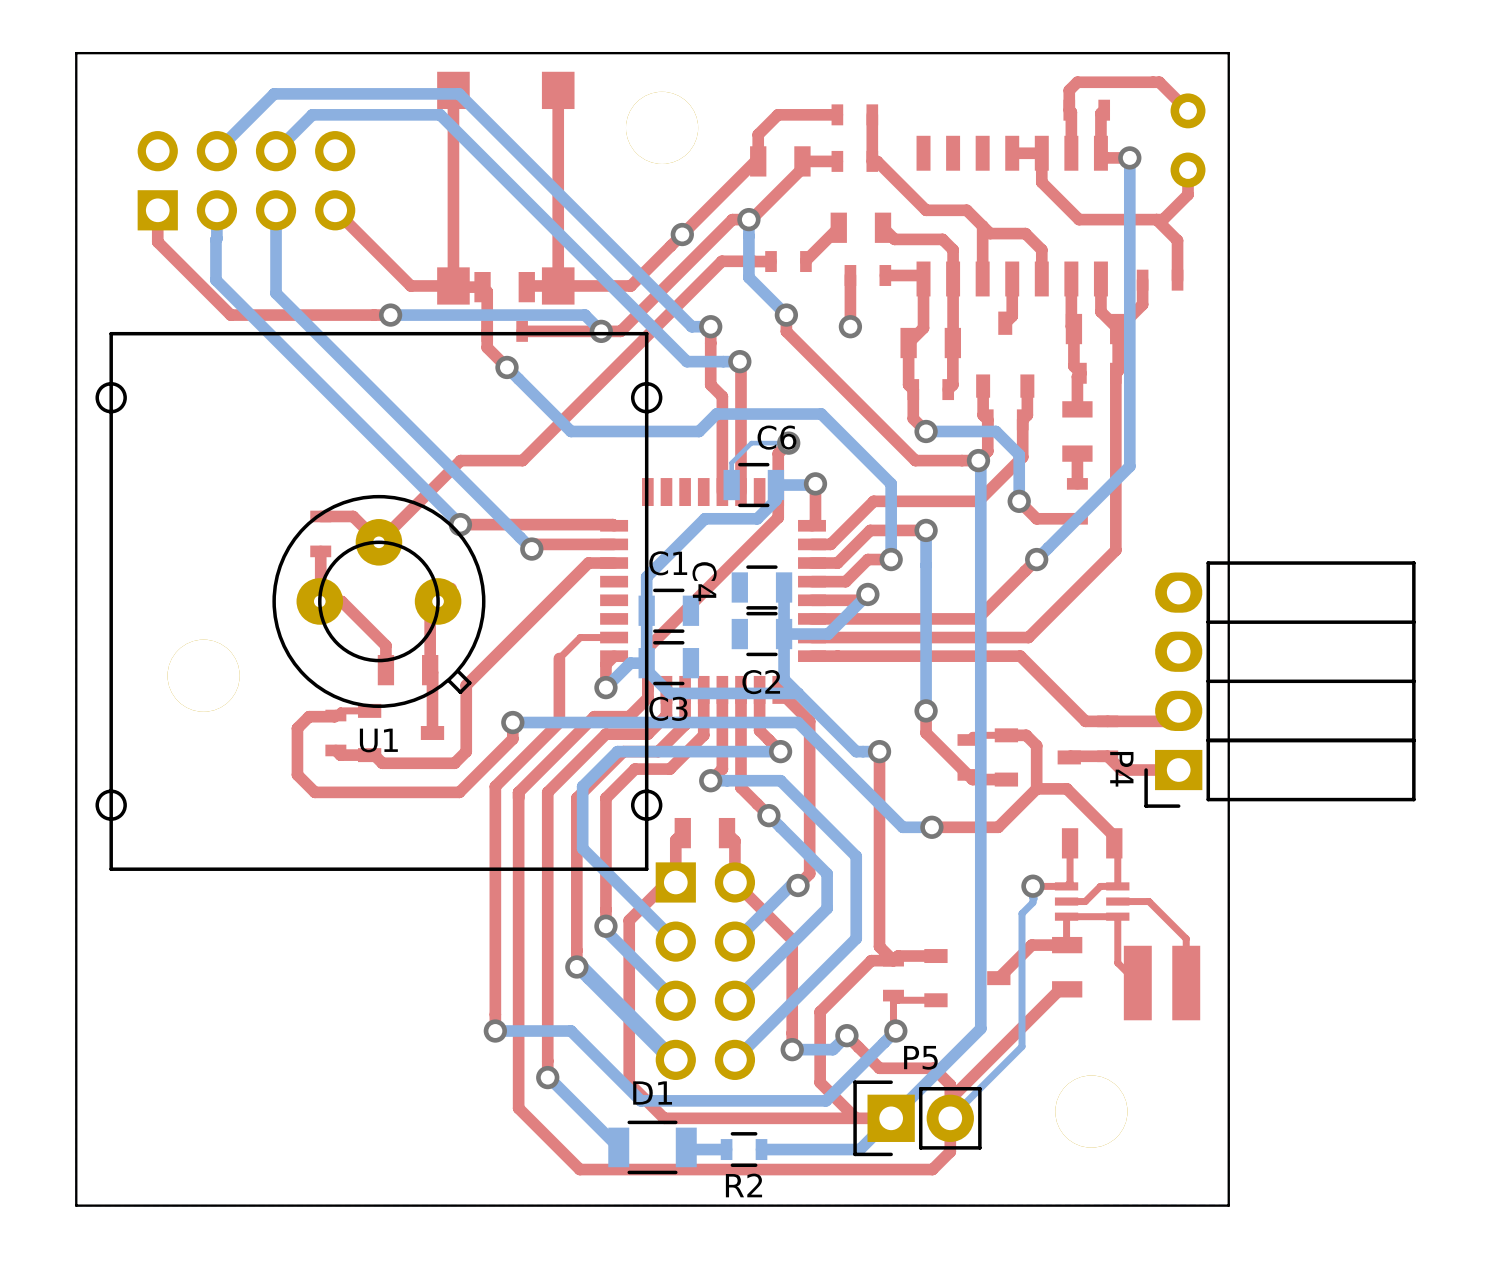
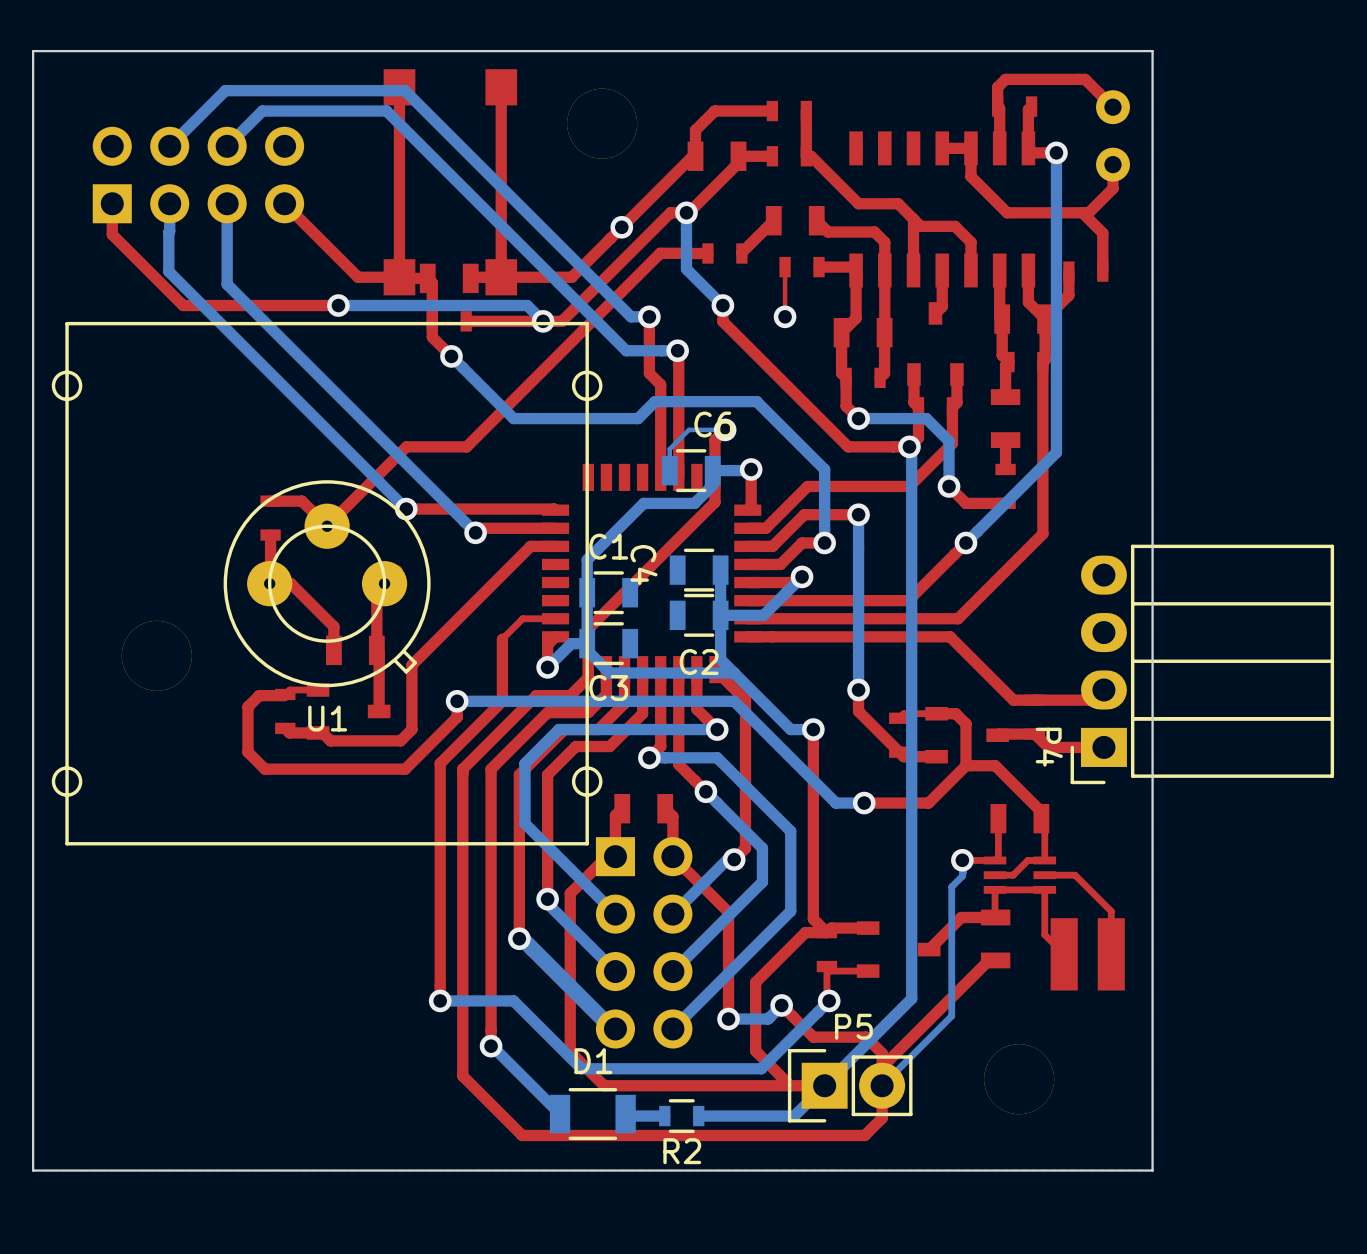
top track width: thick (850, 275) (850, 326) -> thin (785, 267) (785, 316)

